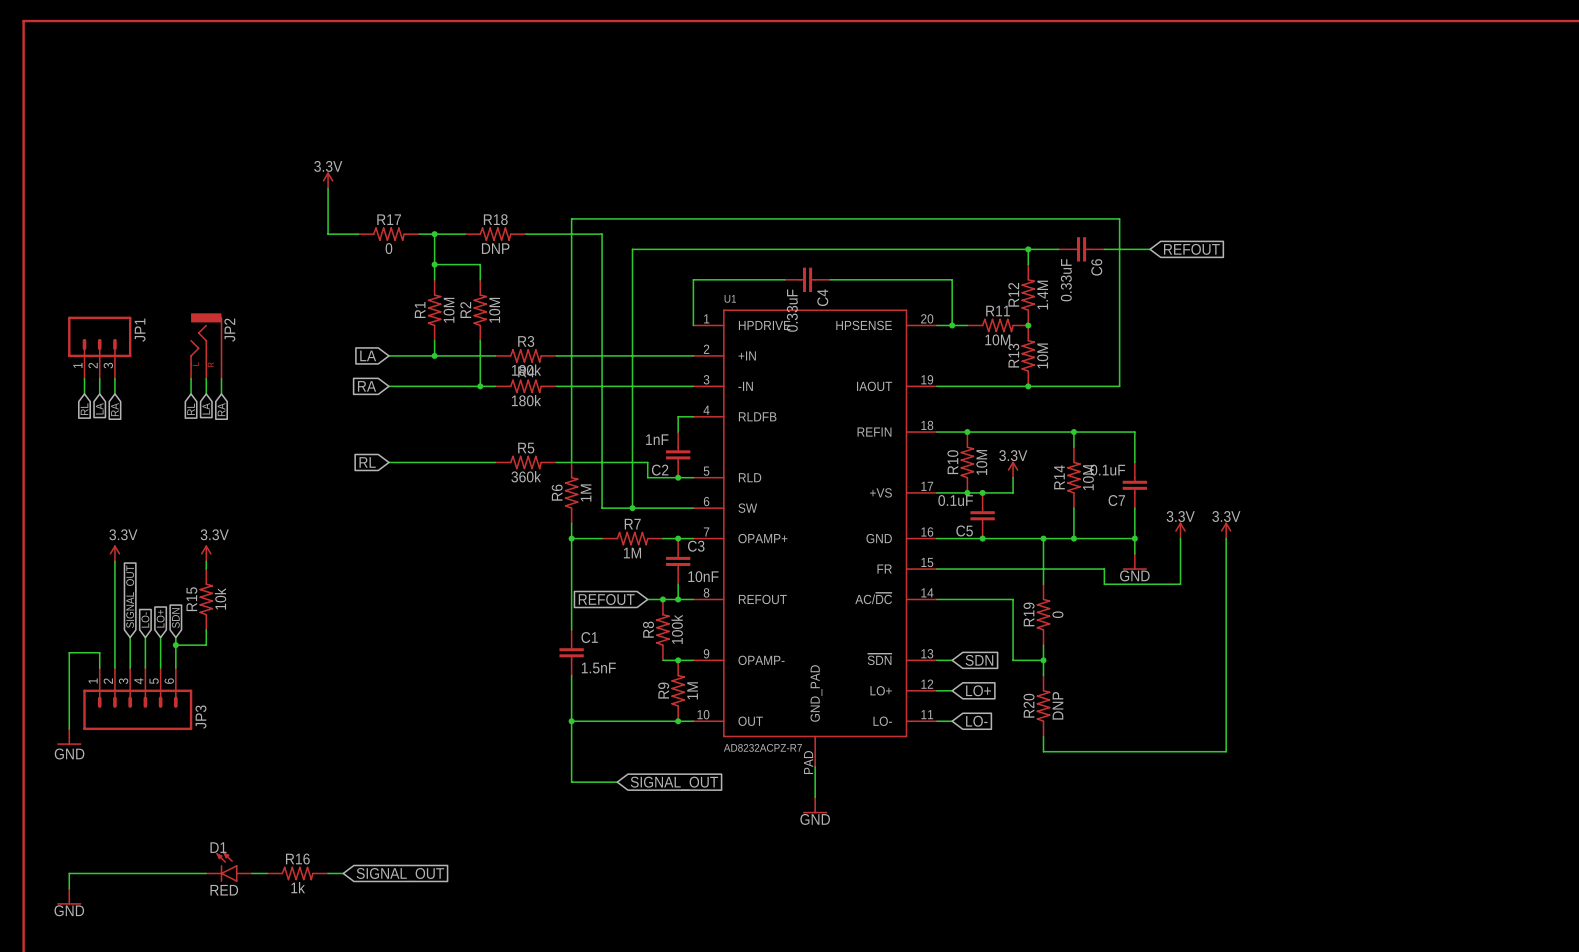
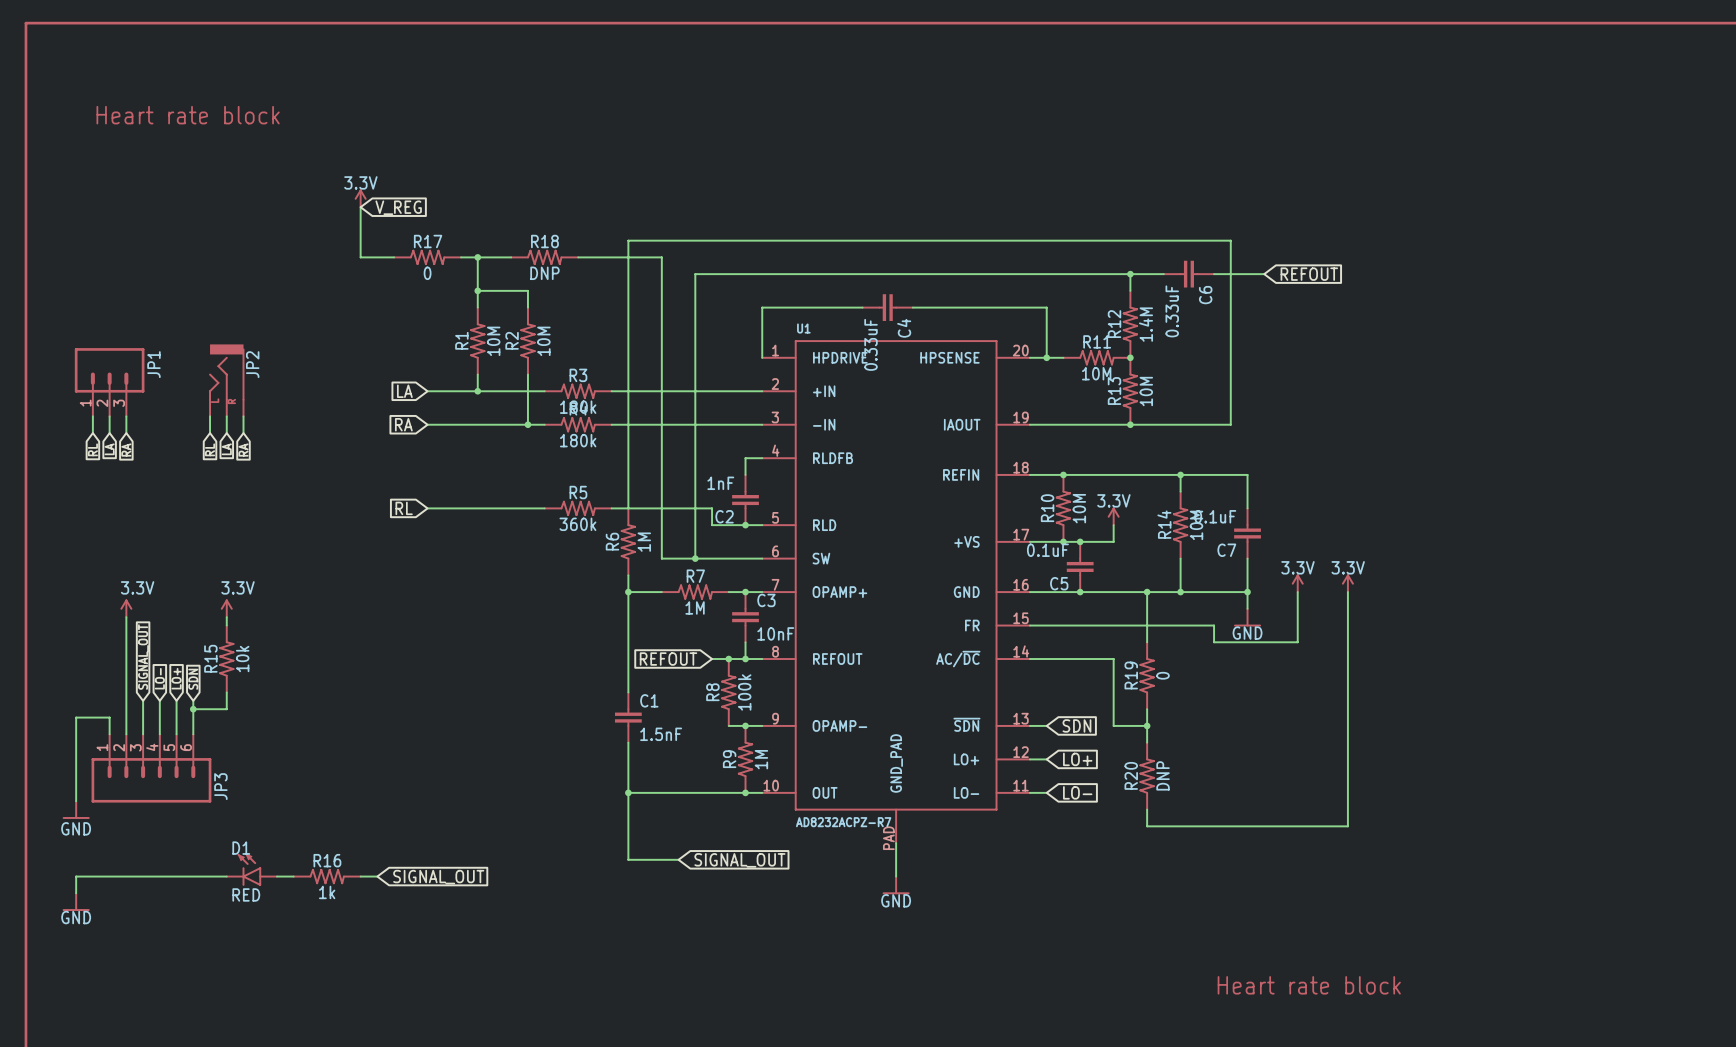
text: none -> Heart rate block (188, 115)
global label: none -> V_REG (398, 207)
D1 position: (229, 867) -> (251, 869)
wire: (206, 873) (69, 873) (69, 888) -> (226, 876) (76, 876) (76, 893)
wire: (251, 873) (267, 873) -> (276, 876) (293, 876)
R16 position: (297, 873) -> (327, 876)
wire: (328, 873) (343, 873) -> (360, 876) (377, 876)
global label position: SIGNAL_OUT (400, 874) -> SIGNAL_OUT (438, 877)
power symbol position: GND (69, 896) -> GND (76, 902)
text: none -> Heart rate block (1309, 985)

